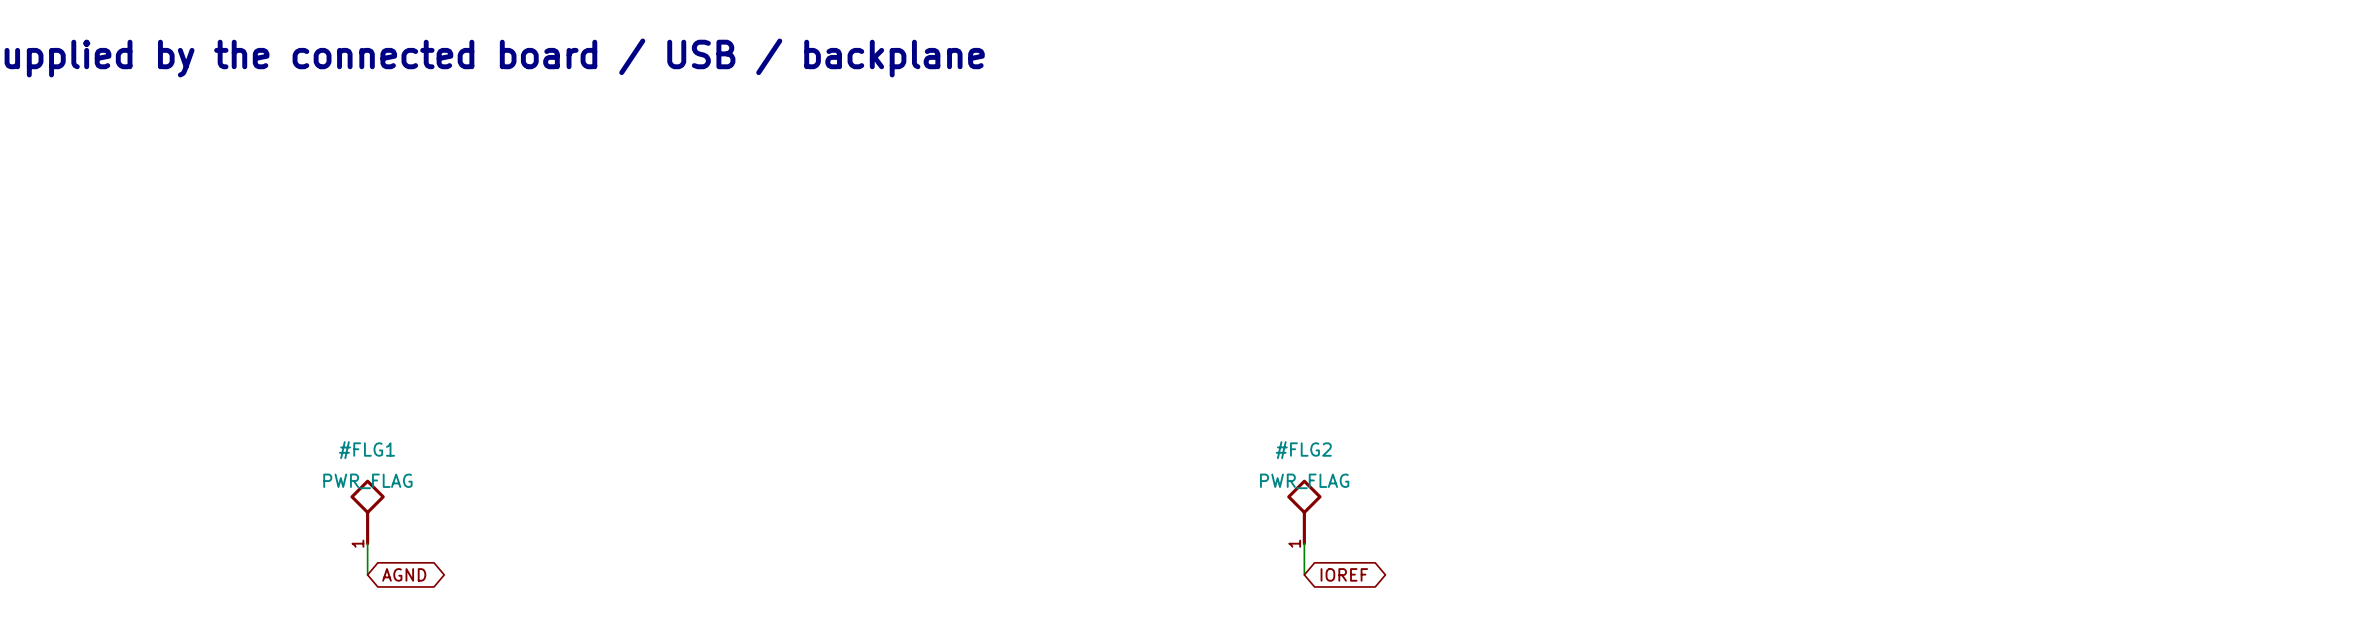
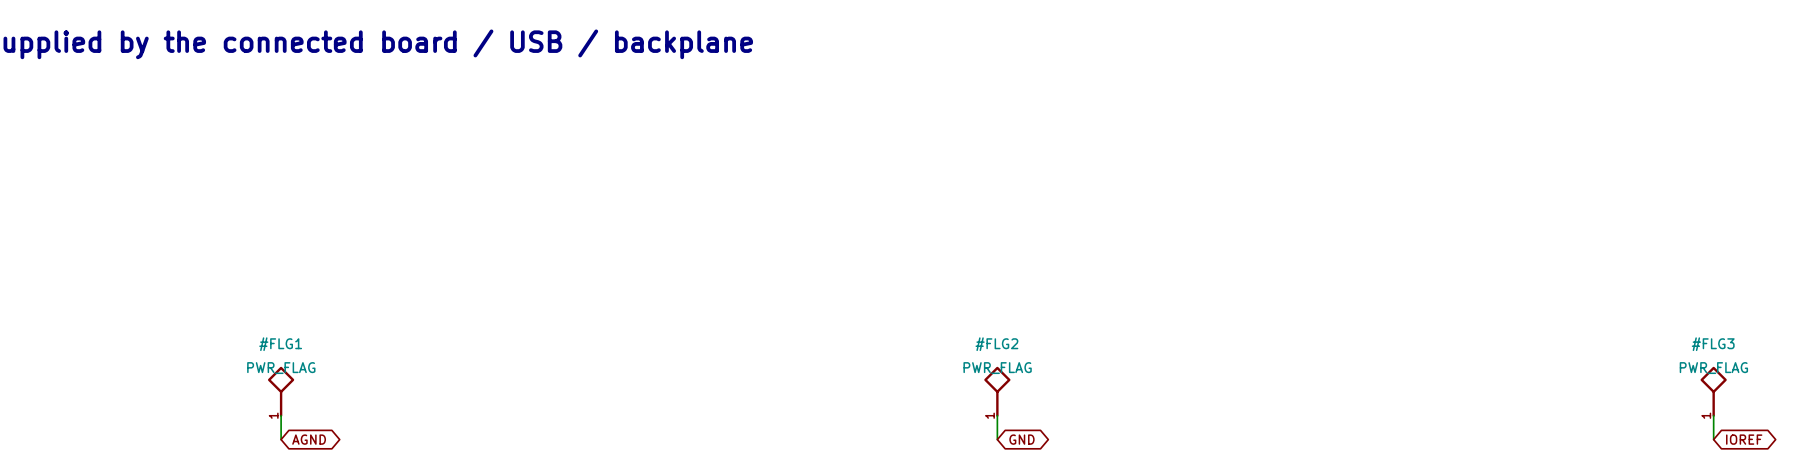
#FLG3: none -> PWR_FLAG (1713, 391)
wire: none -> (1713, 415) (1713, 439)
global label: IOREF (1344, 574) -> GND (1021, 439)
global label: none -> IOREF (1744, 439)

